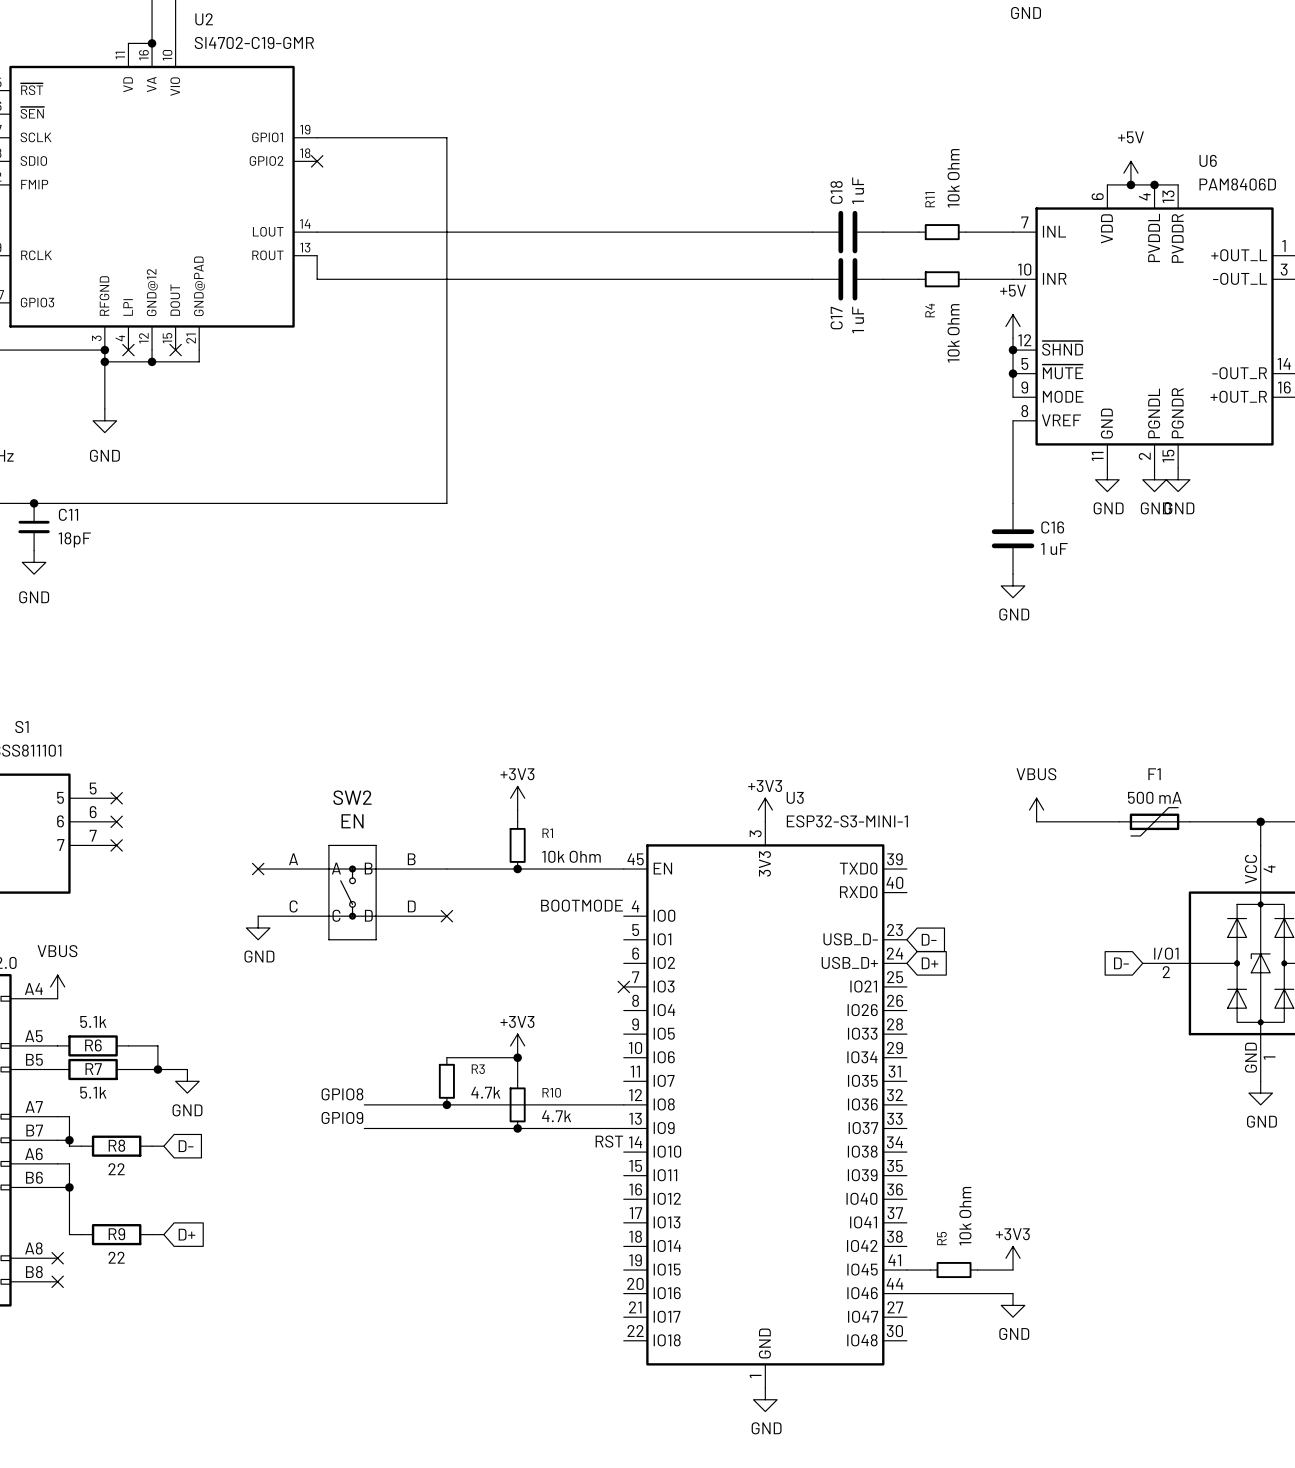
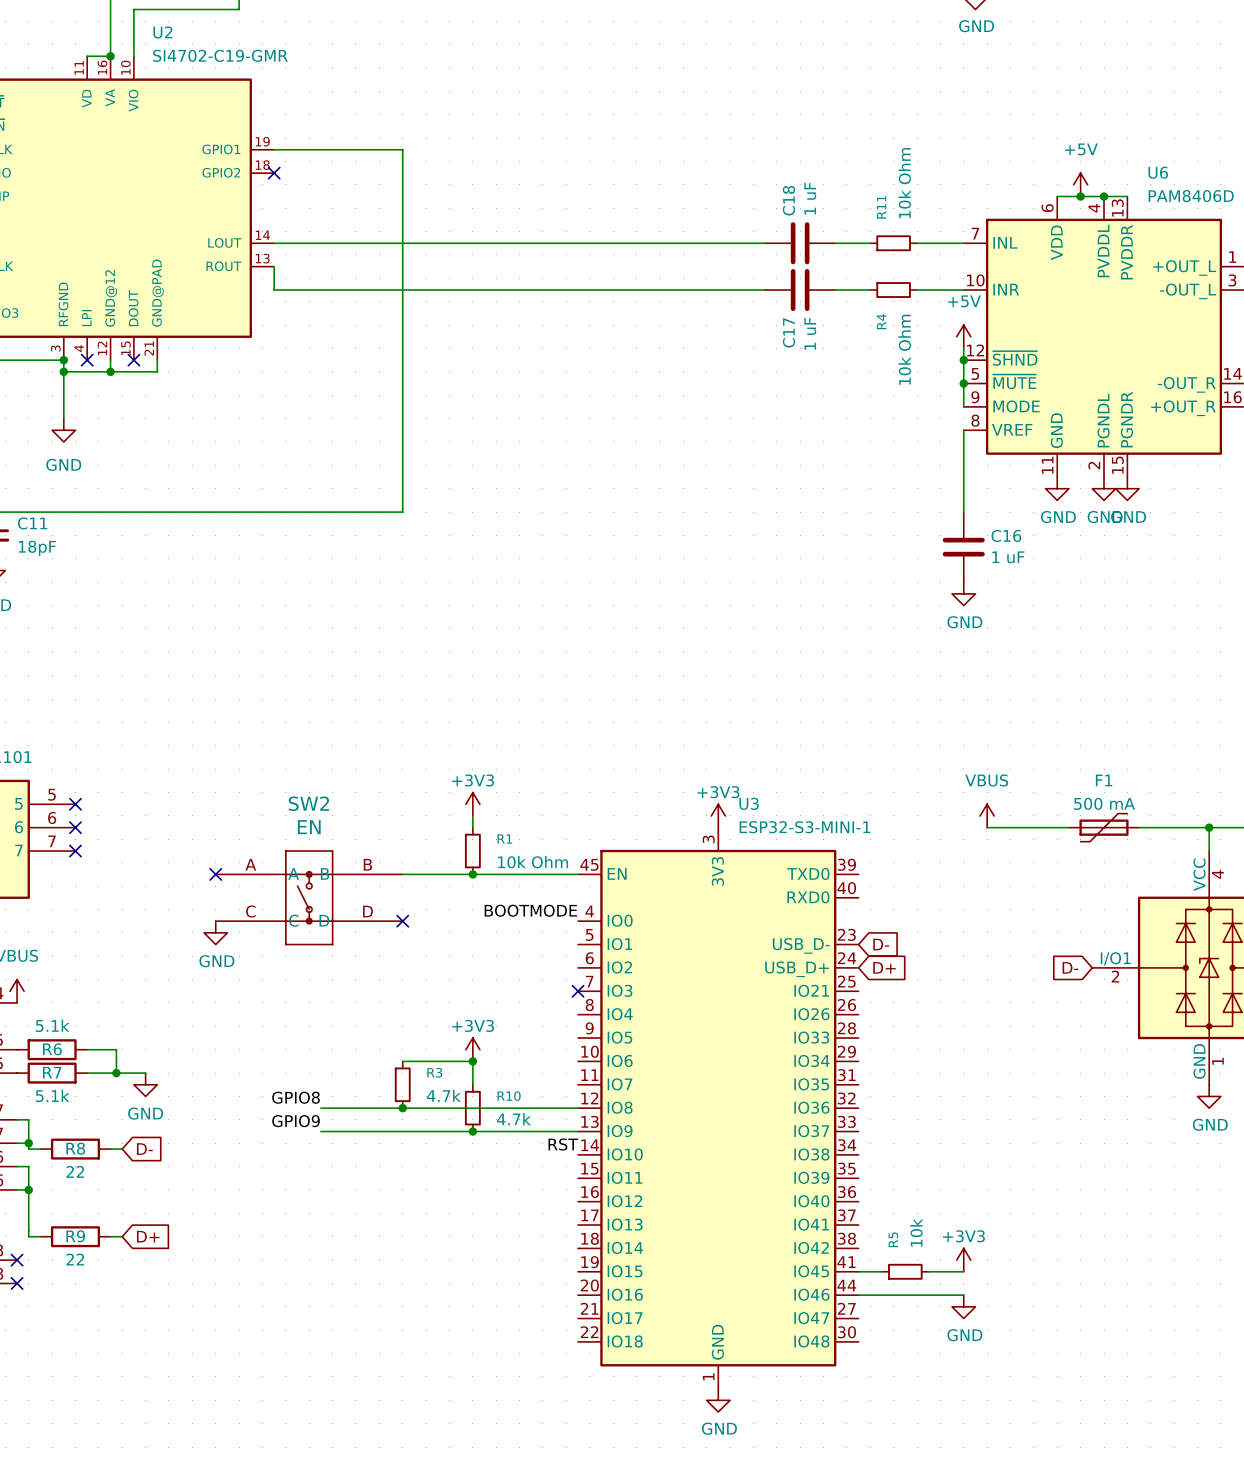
R5 value: 10k Ohm (965, 1216) -> 10k (916, 1232)

